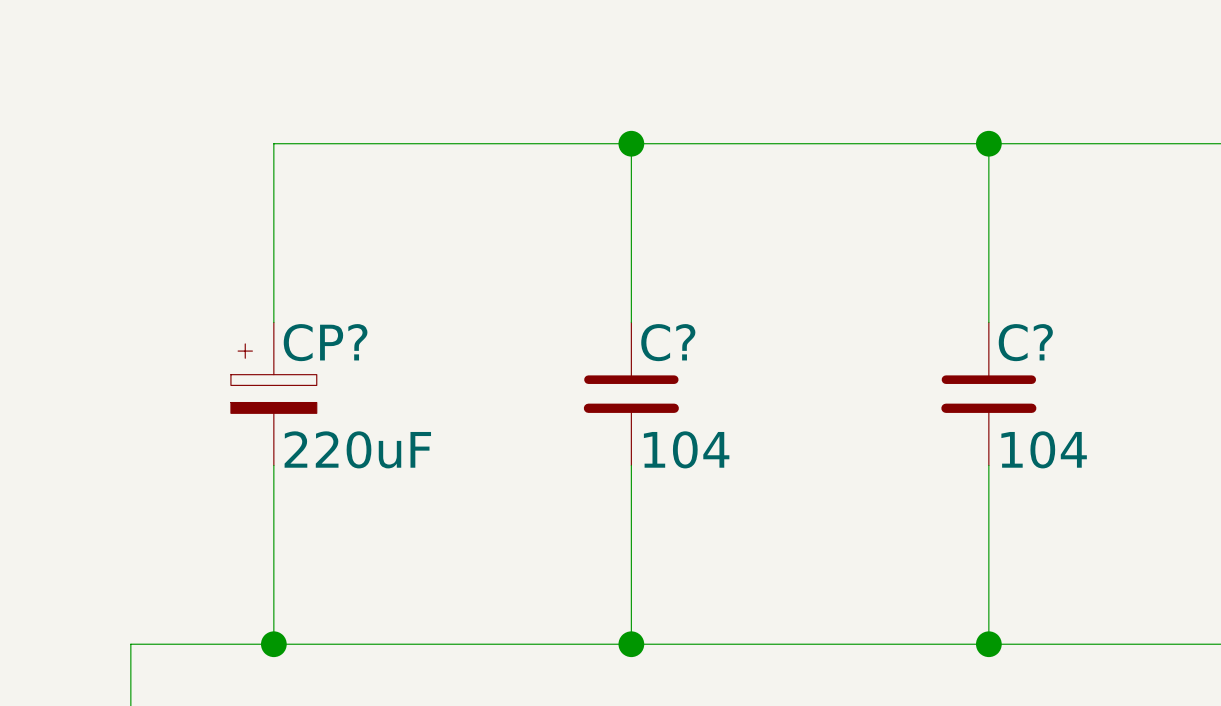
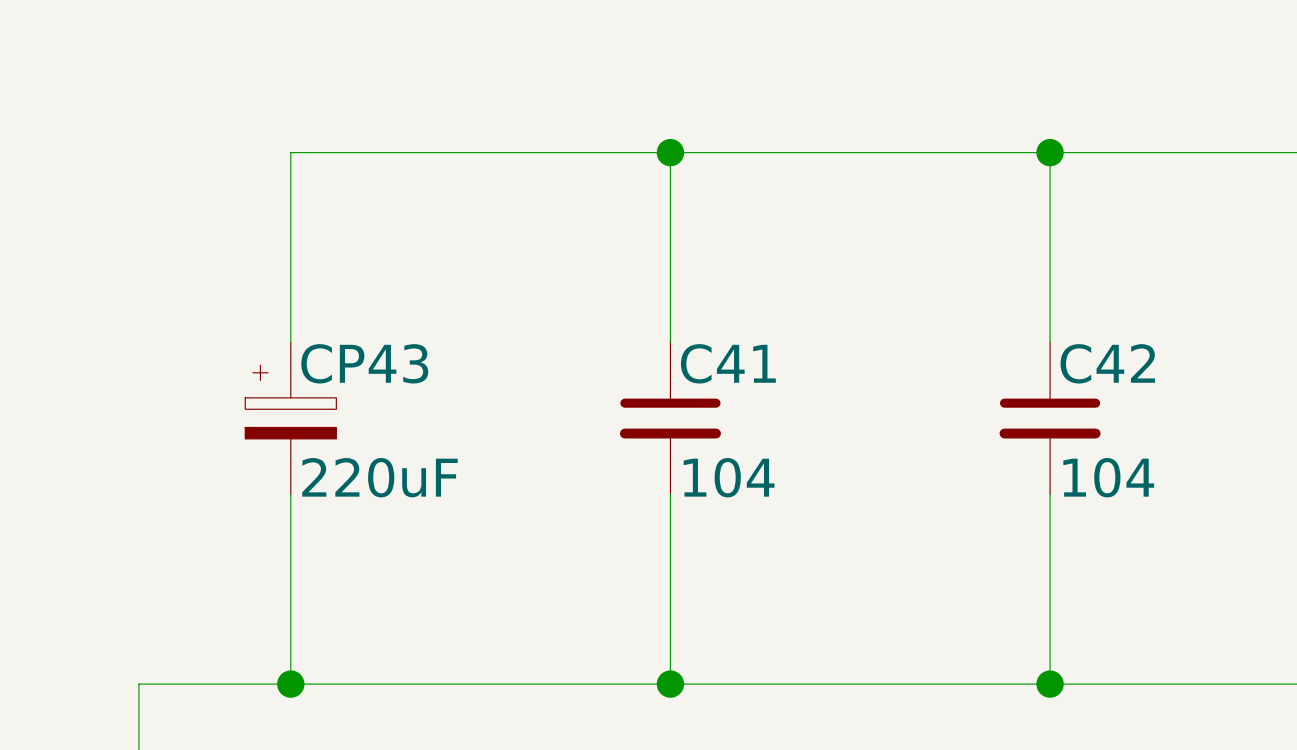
CP? name: CP? (325, 342) -> CP43 (364, 363)
C? name: C? (668, 342) -> C41 (728, 363)
C? name: C? (1025, 342) -> C42 (1107, 363)

